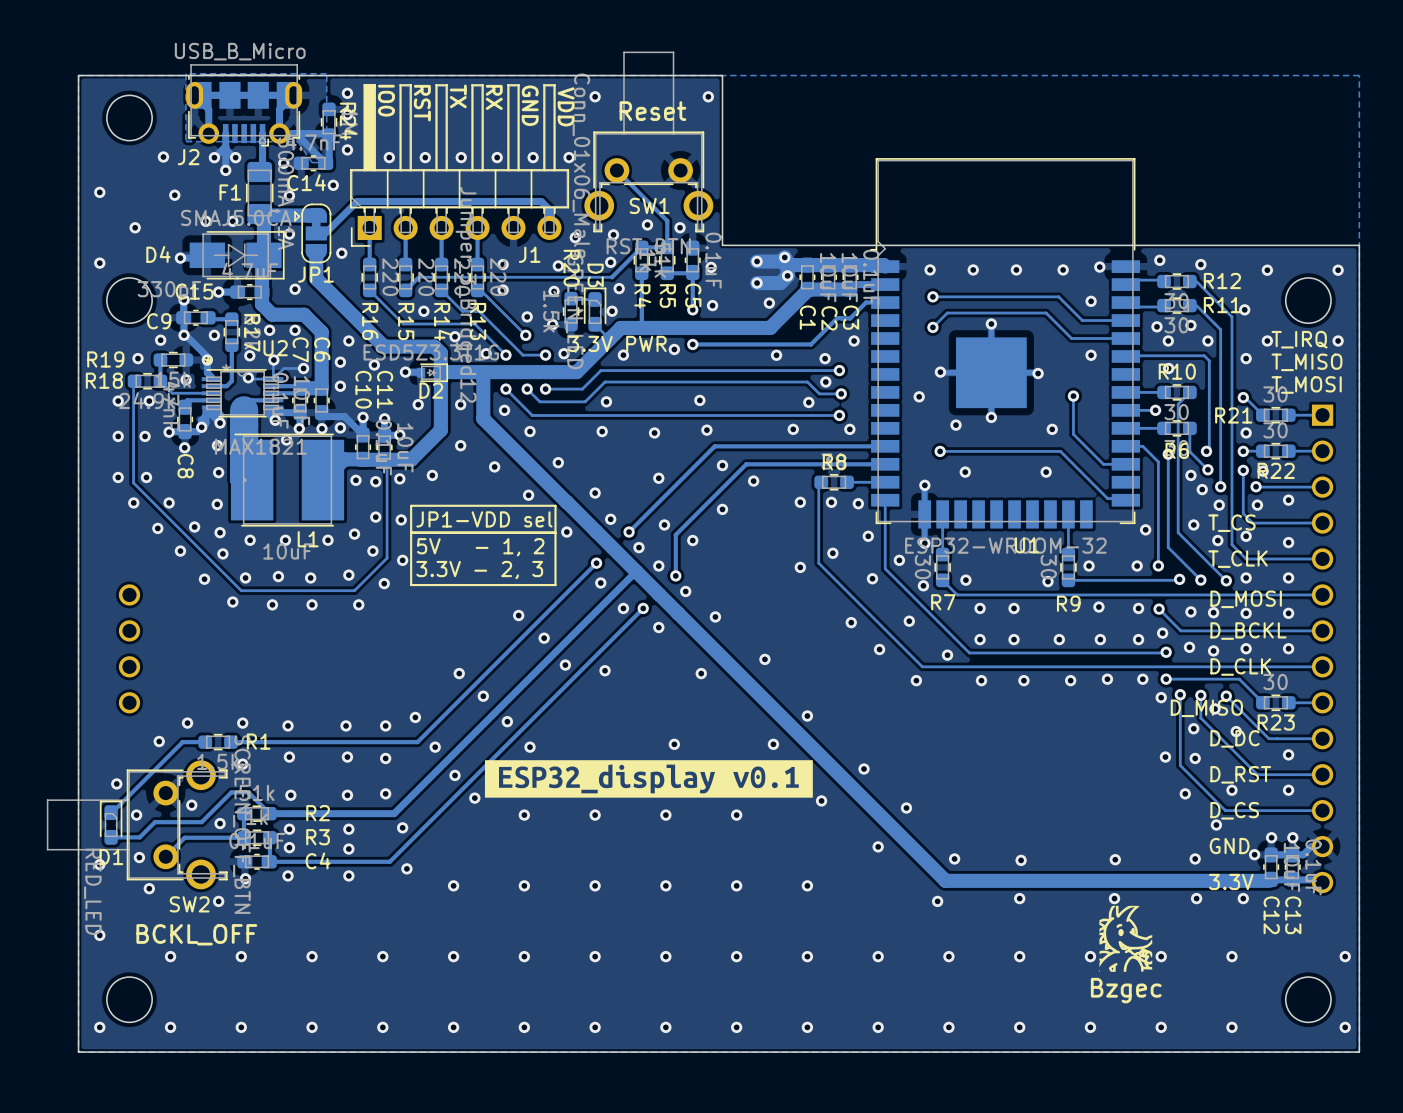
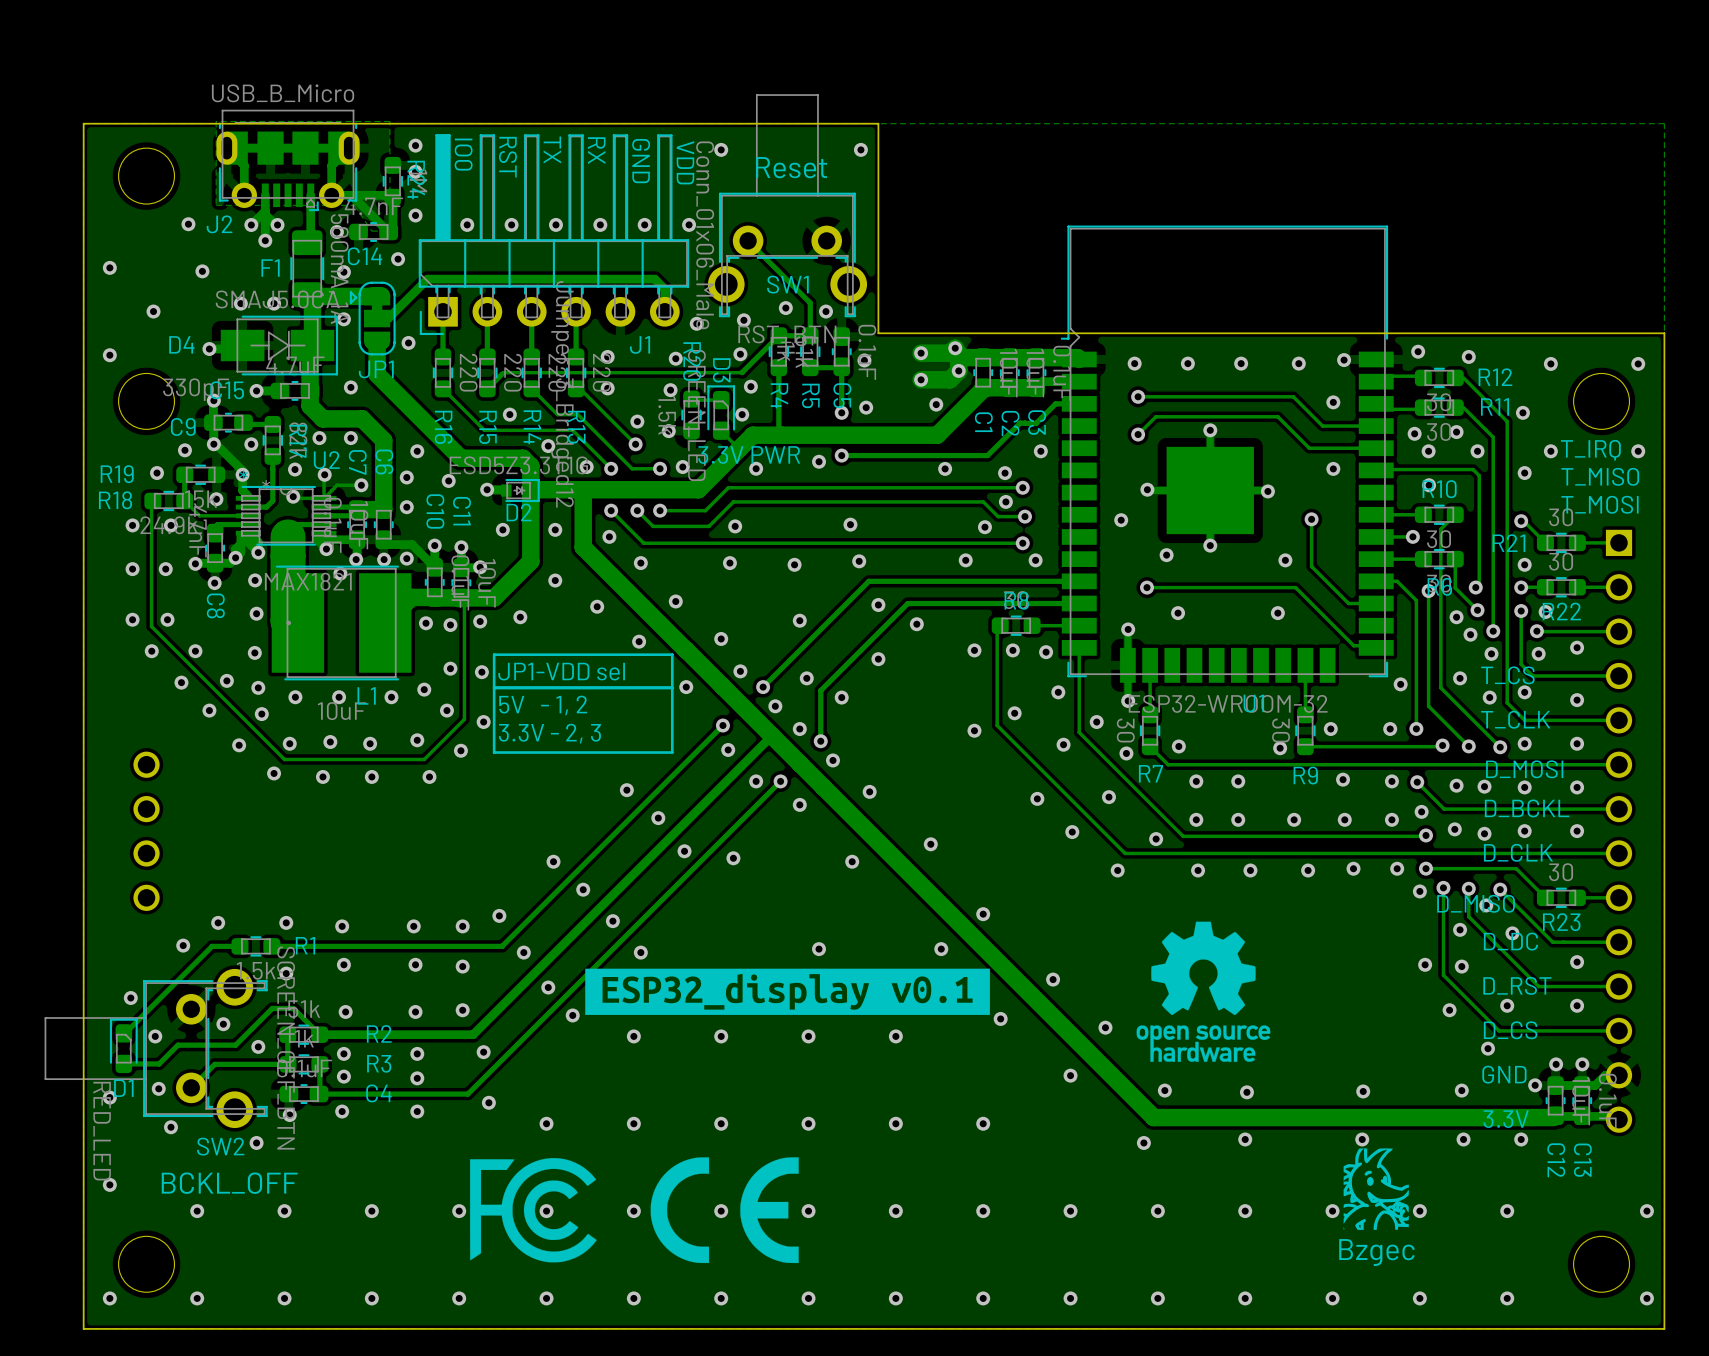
drawing: none -> [1136, 921, 1271, 1062]
drawing: none -> [470, 1158, 597, 1263]
drawing: none -> [650, 1157, 799, 1264]

